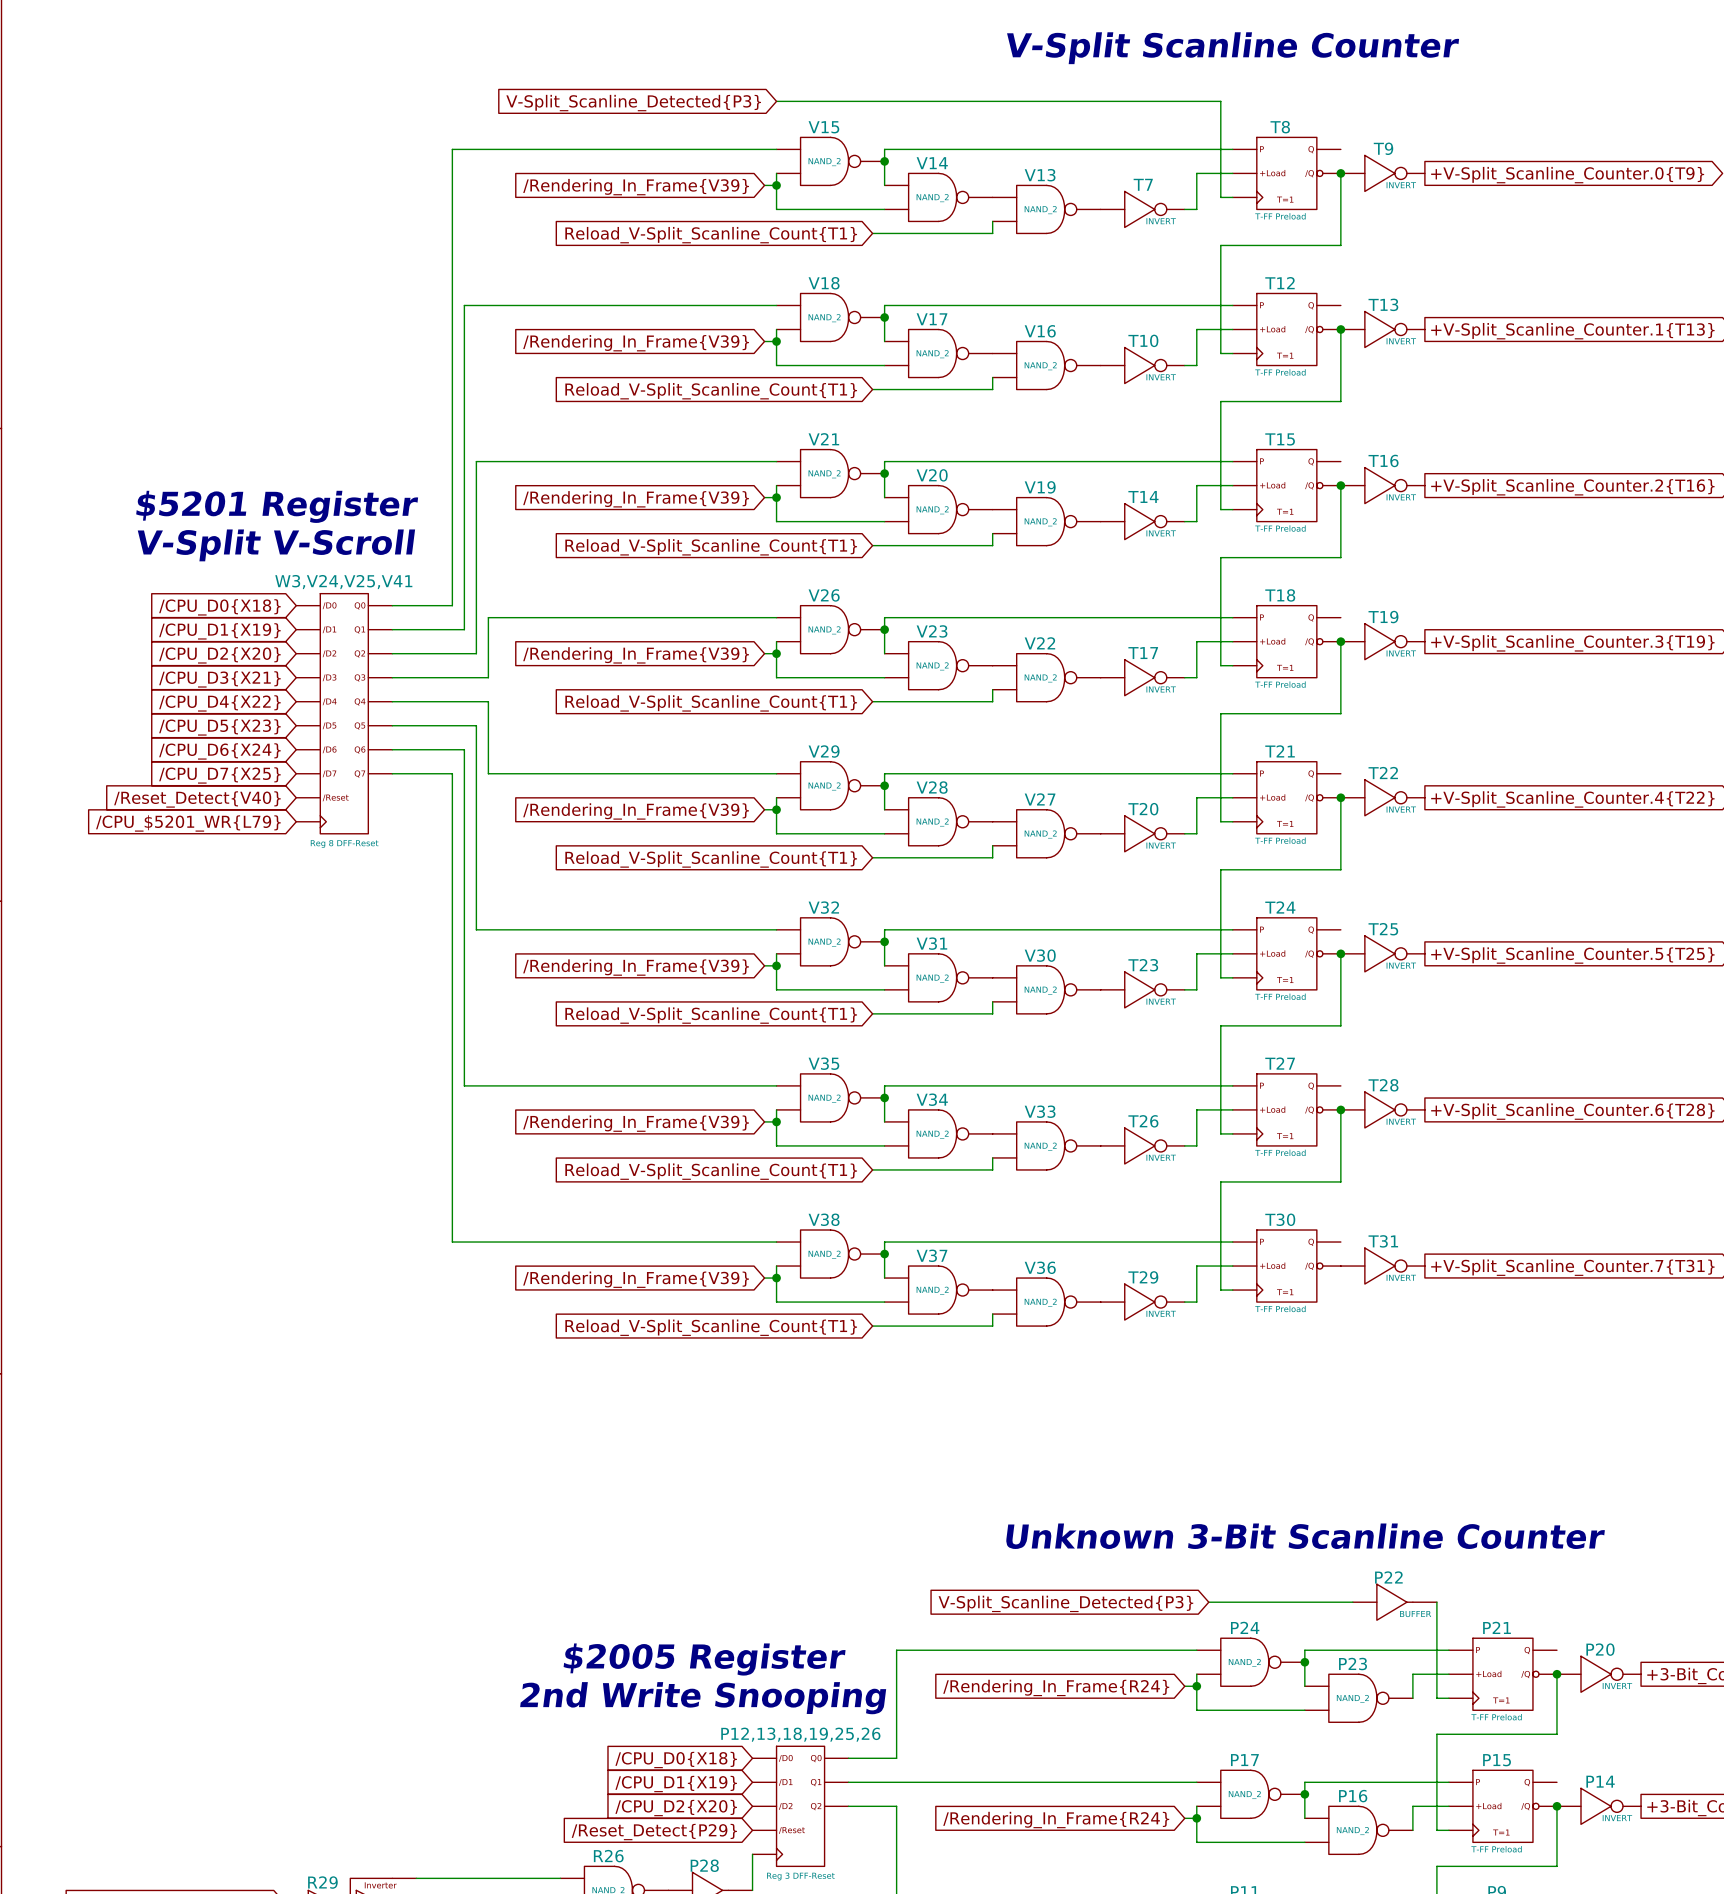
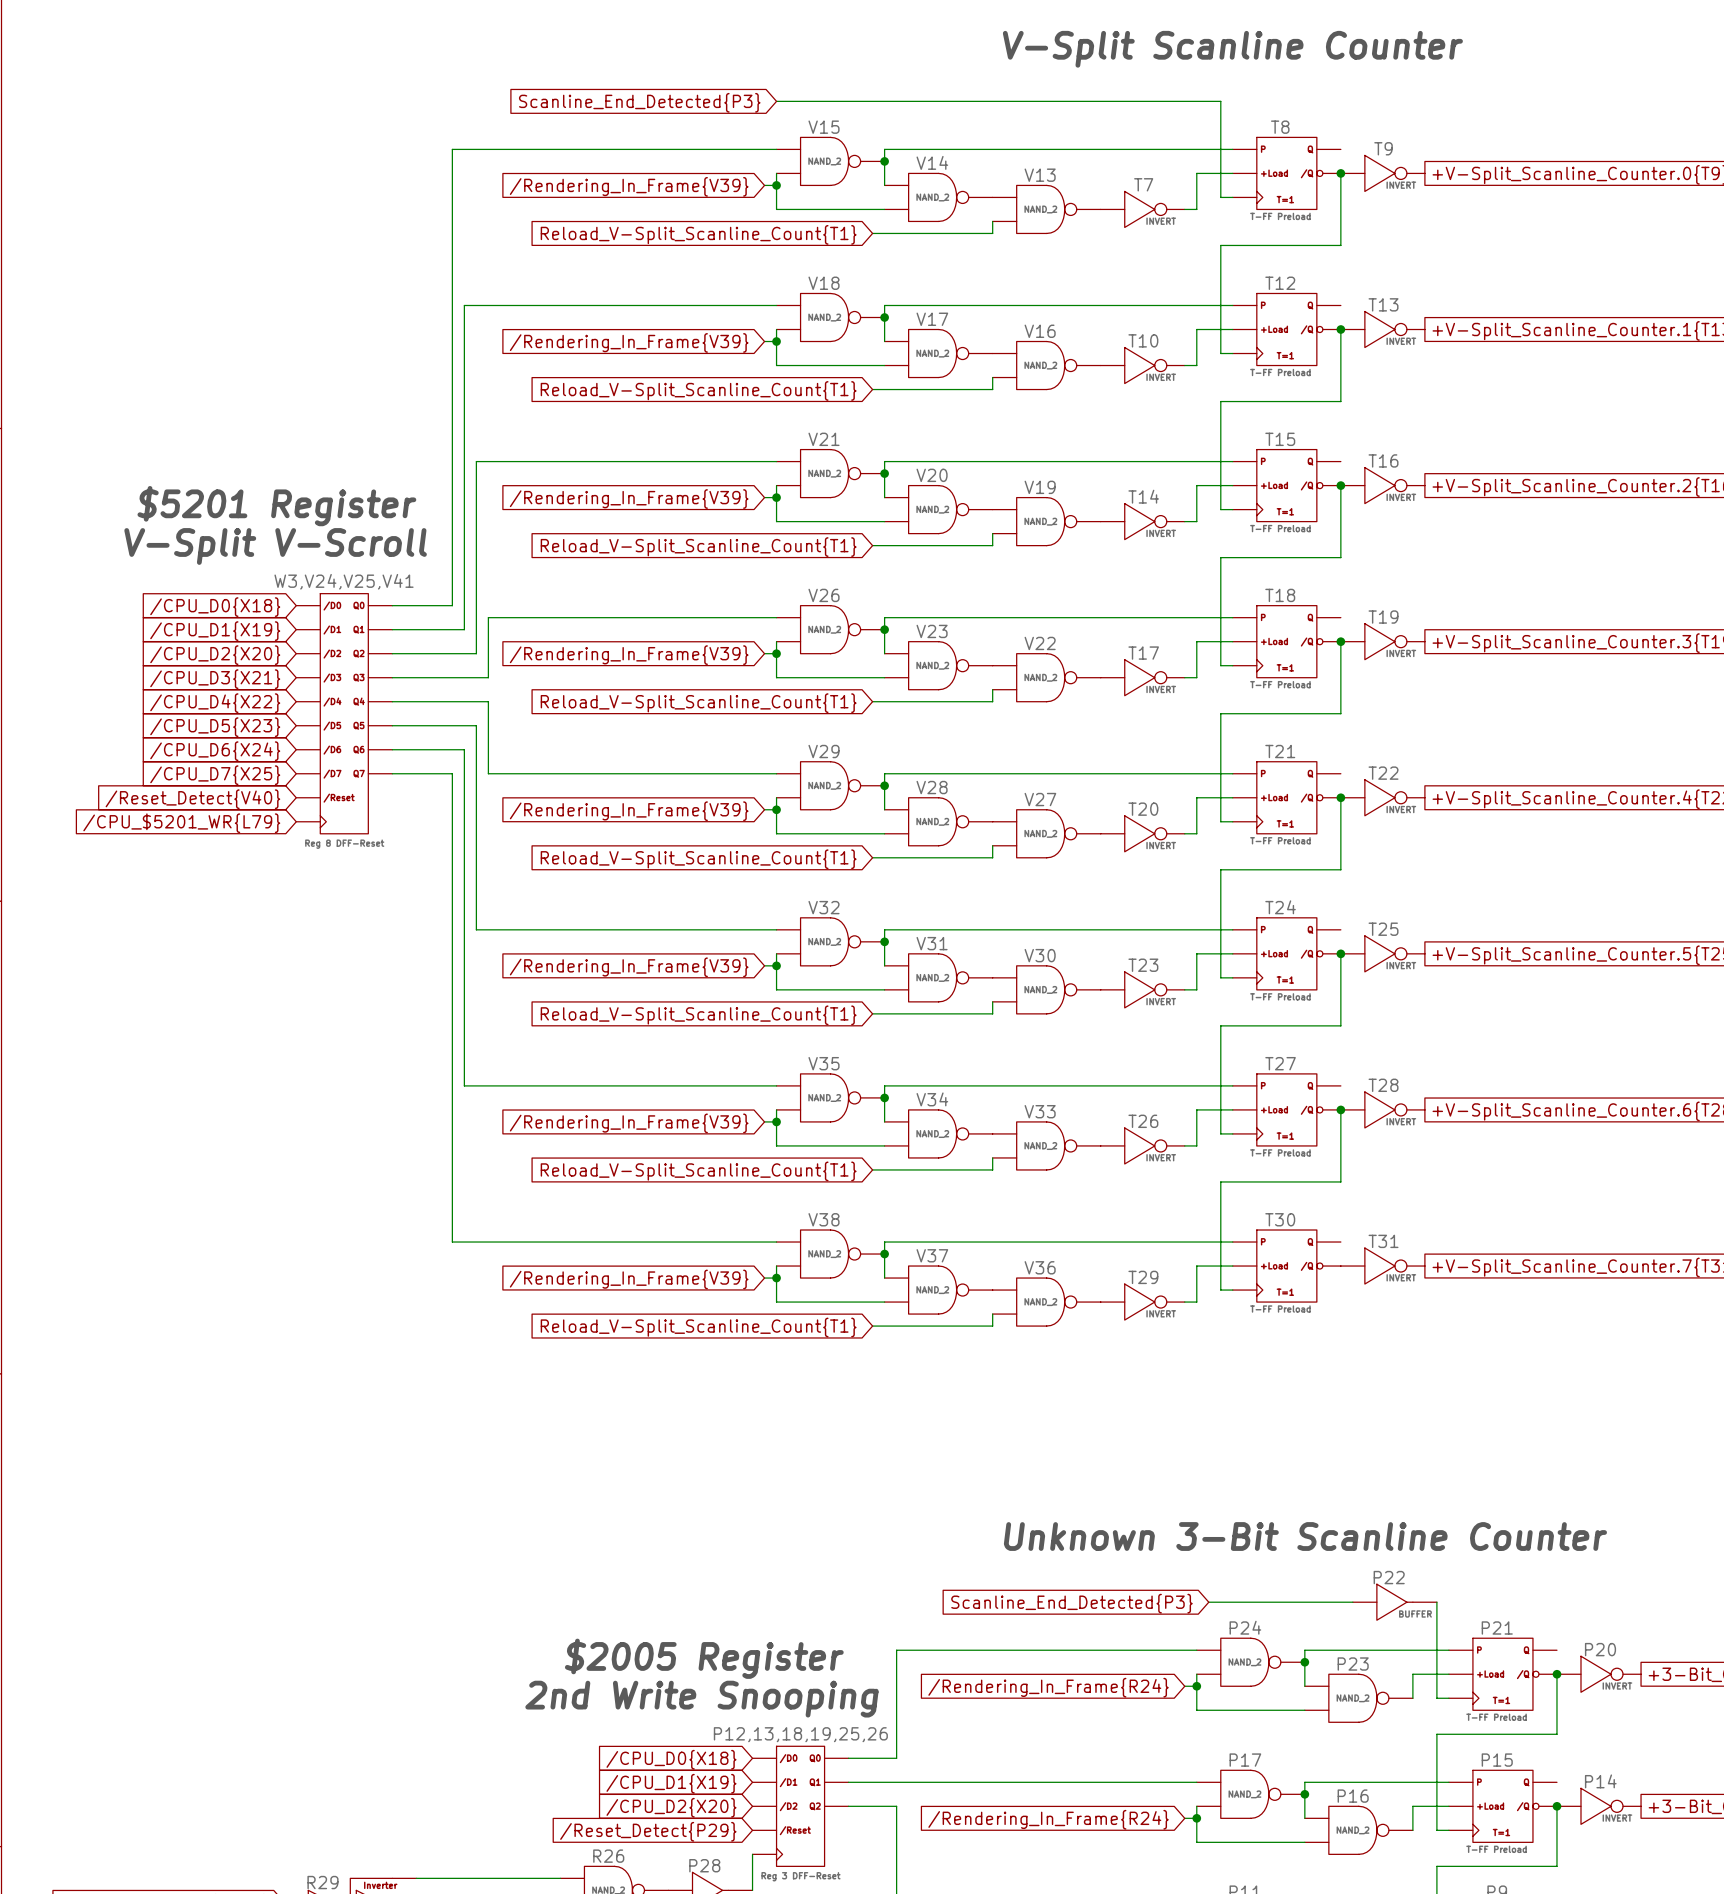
global label: V-Split_Scanline_Detected{P3} (633, 103) -> Scanline_End_Detected{P3} (639, 102)
global label: V-Split_Scanline_Detected{P3} (1065, 1603) -> Scanline_End_Detected{P3} (1071, 1603)

